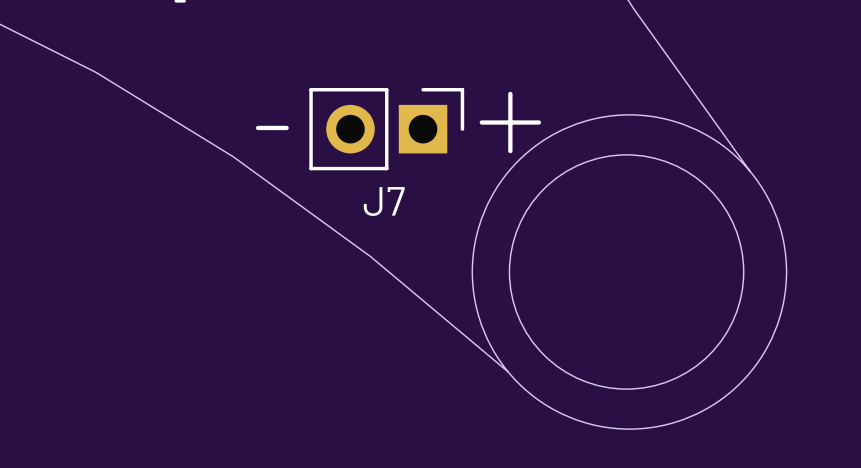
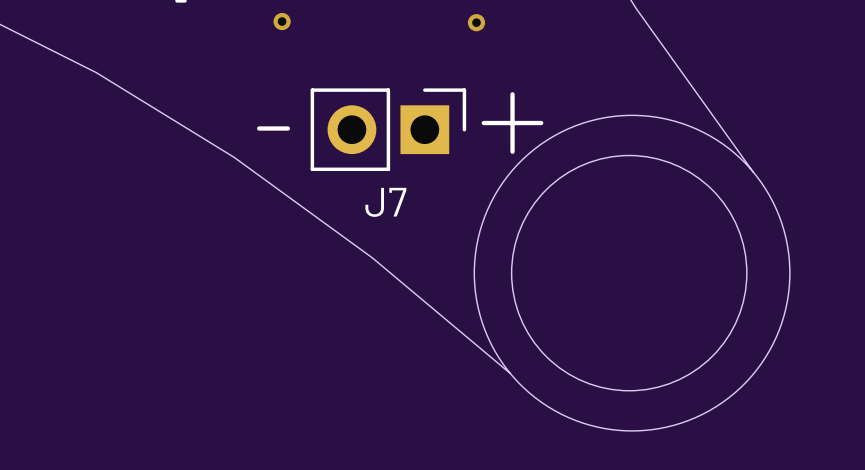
via: none -> (282, 21)
via: none -> (476, 22)

